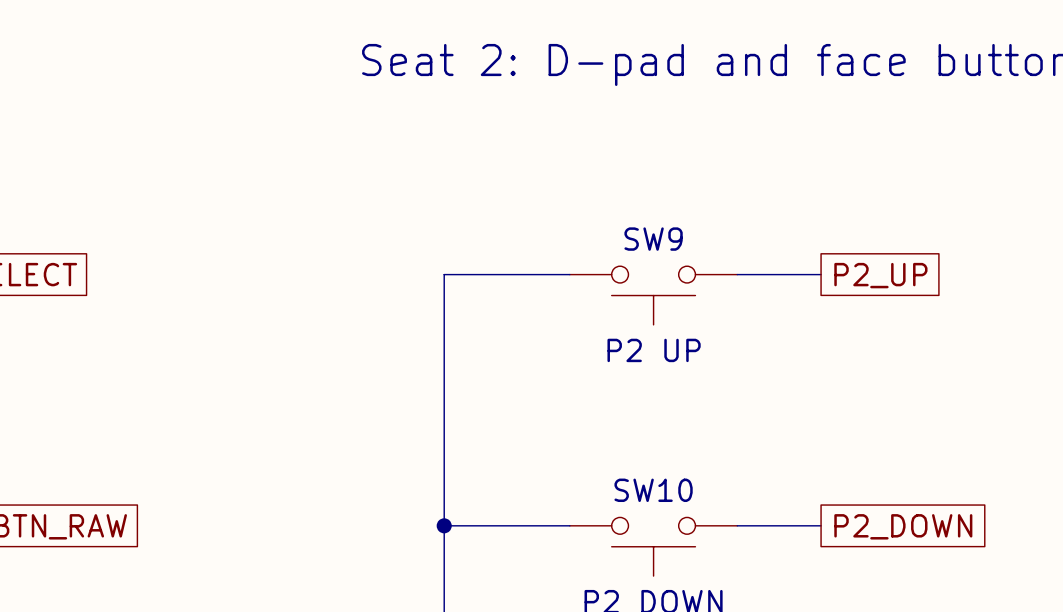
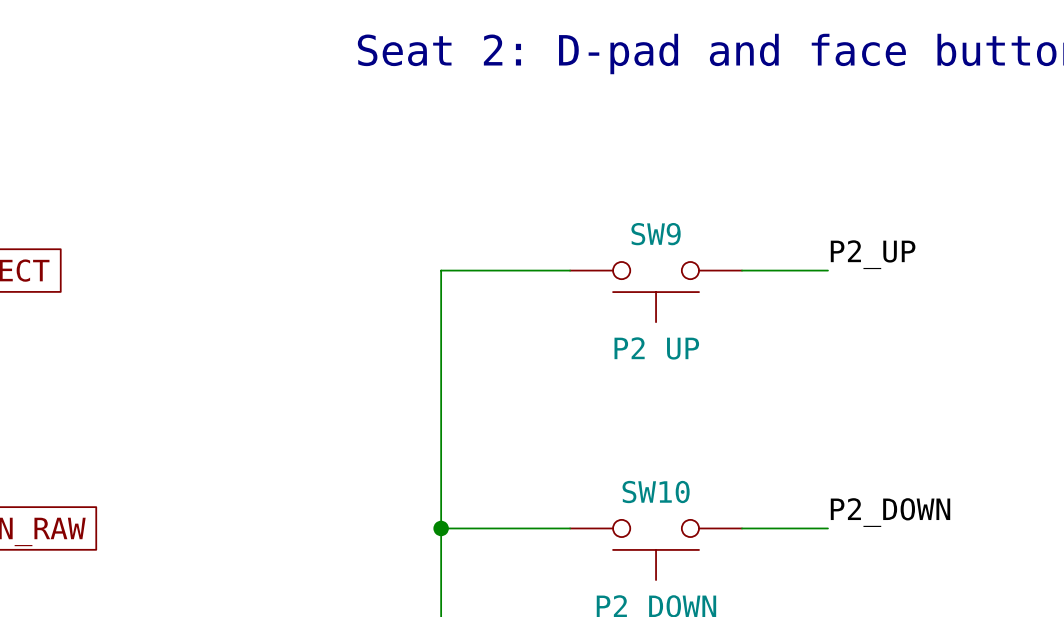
label: none -> P2_UP (873, 254)
global label: P2_UP (880, 275) -> none
label: none -> P2_DOWN (890, 512)
global label: P2_DOWN (903, 526) -> none

